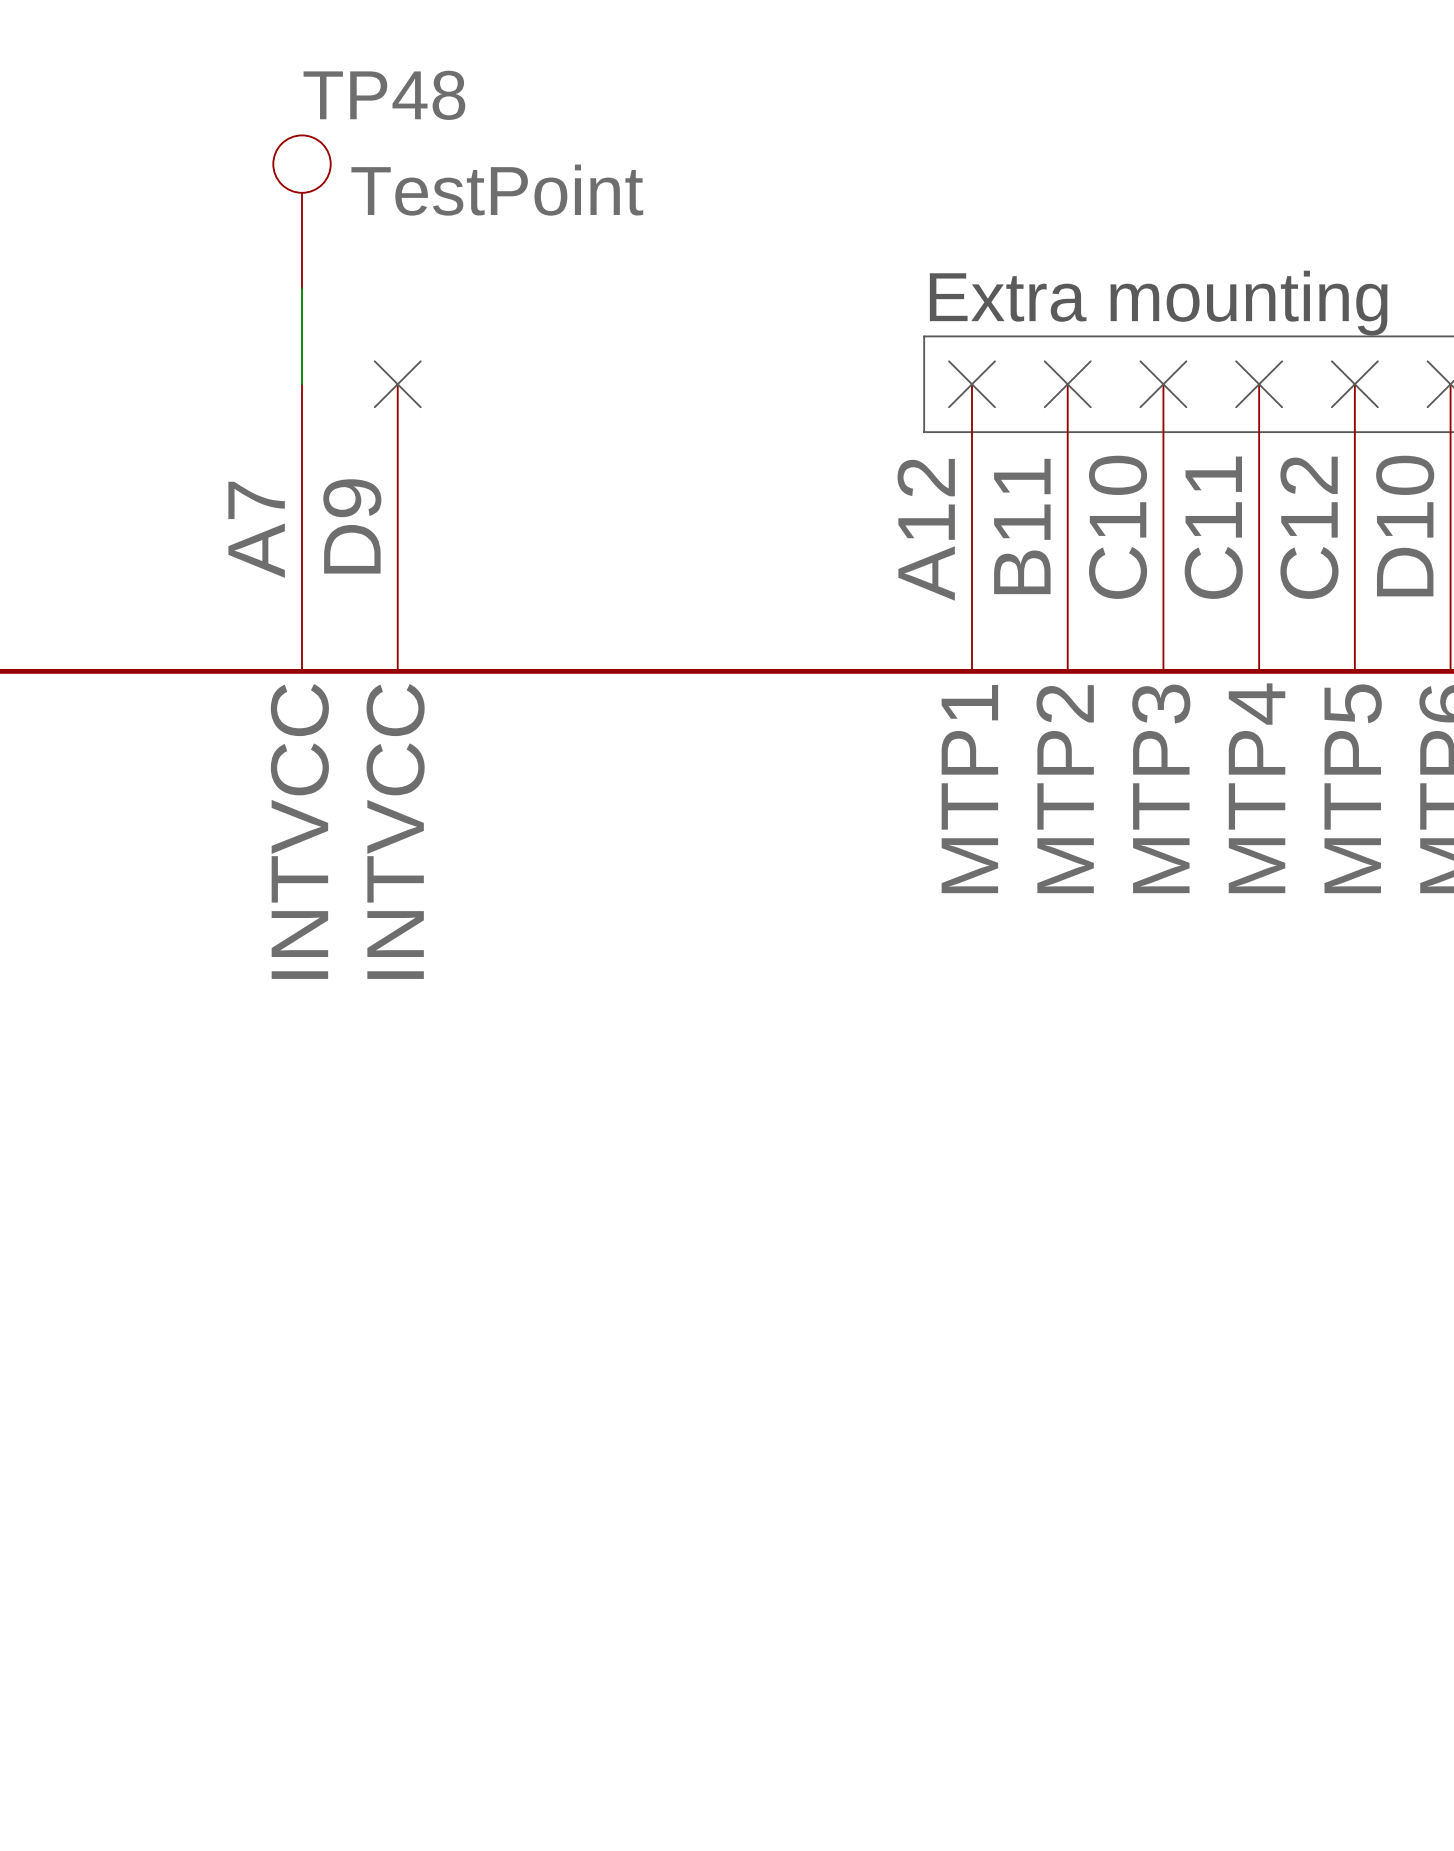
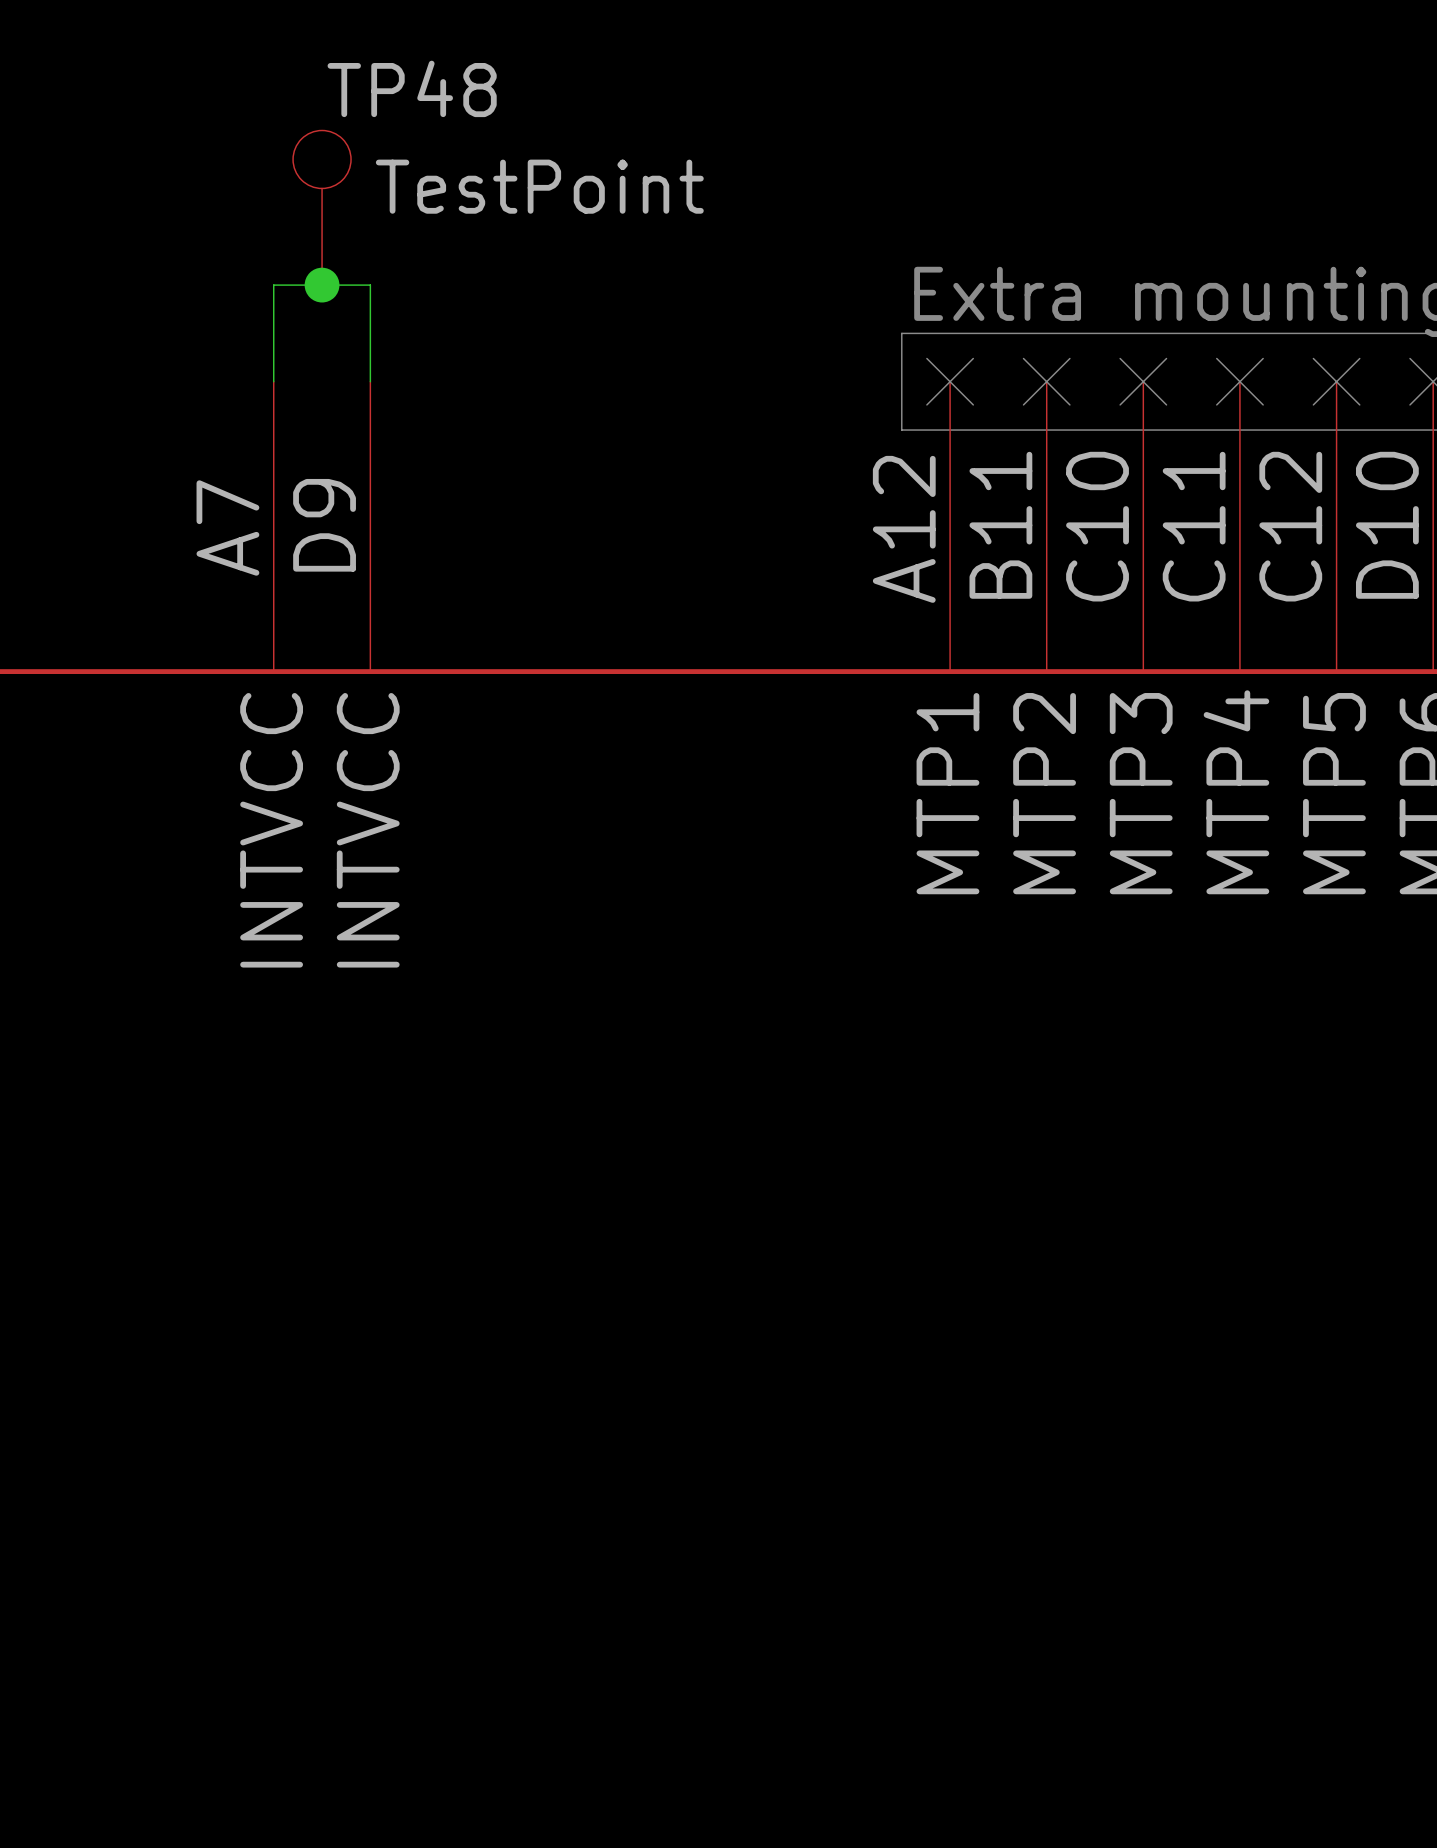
TP48 position: (302, 211) -> (322, 207)
wire: none -> (273, 285) (370, 285) (370, 381)
junction: none -> (322, 285)
no-connect mark: (397, 384) -> none

